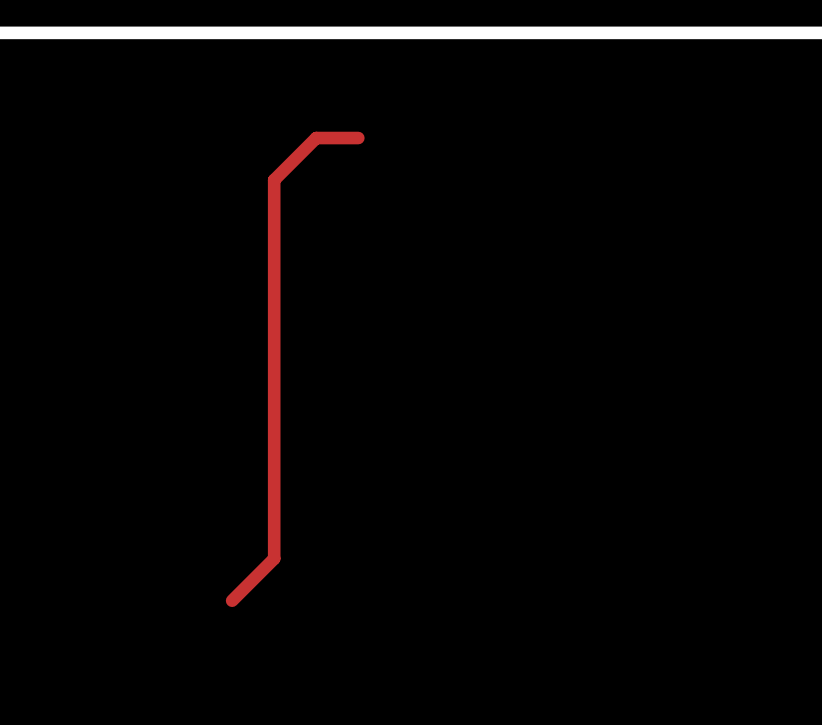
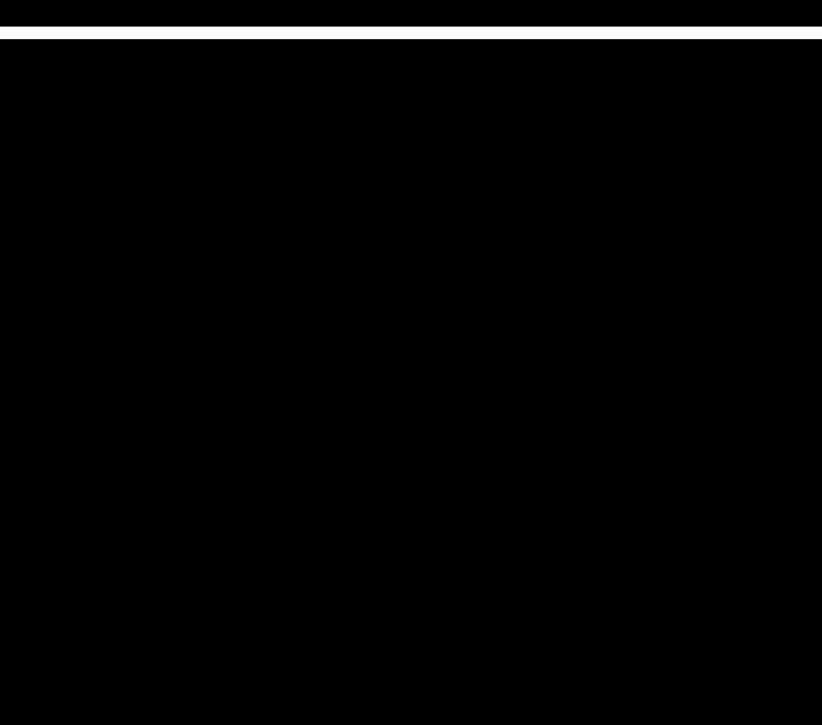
top track: (358, 138) (316, 138) (274, 180) (274, 558) (232, 600) -> none

